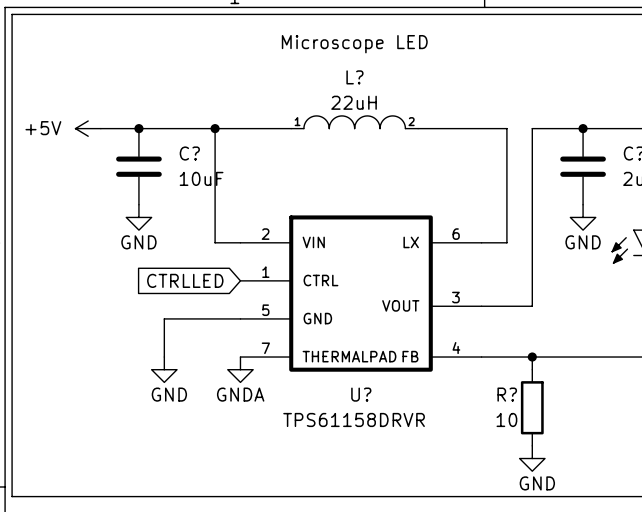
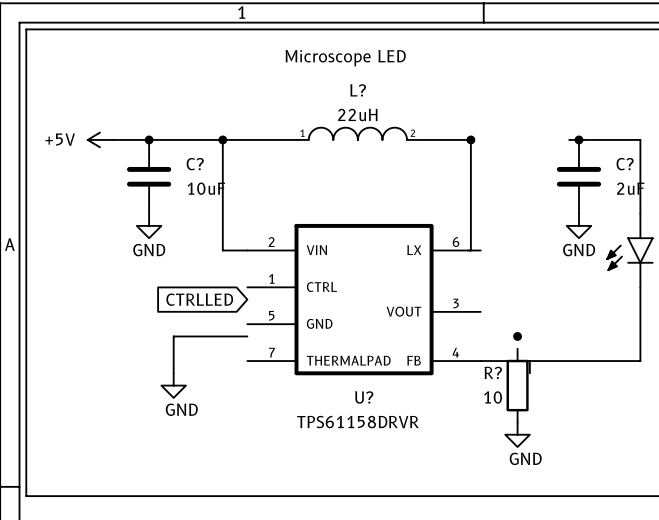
wire: (471, 128) (506, 128) (506, 242) (481, 242) -> (470, 139) (470, 250) (468, 250)
junction: none -> (470, 139)
wire: (572, 128) (532, 128) (532, 306) (481, 306) -> none
global label position: CTRLLED (185, 280) -> CTRLLED (199, 299)
wire: (240, 318) (164, 318) (164, 331) -> (247, 336) (173, 336)
junction position: (532, 357) -> (517, 336)
power symbol position: GND (164, 369) -> GND (173, 385)
power symbol: GNDA (240, 369) -> none
R? position: (532, 407) -> (517, 385)
power symbol position: GND (532, 458) -> GND (517, 434)

